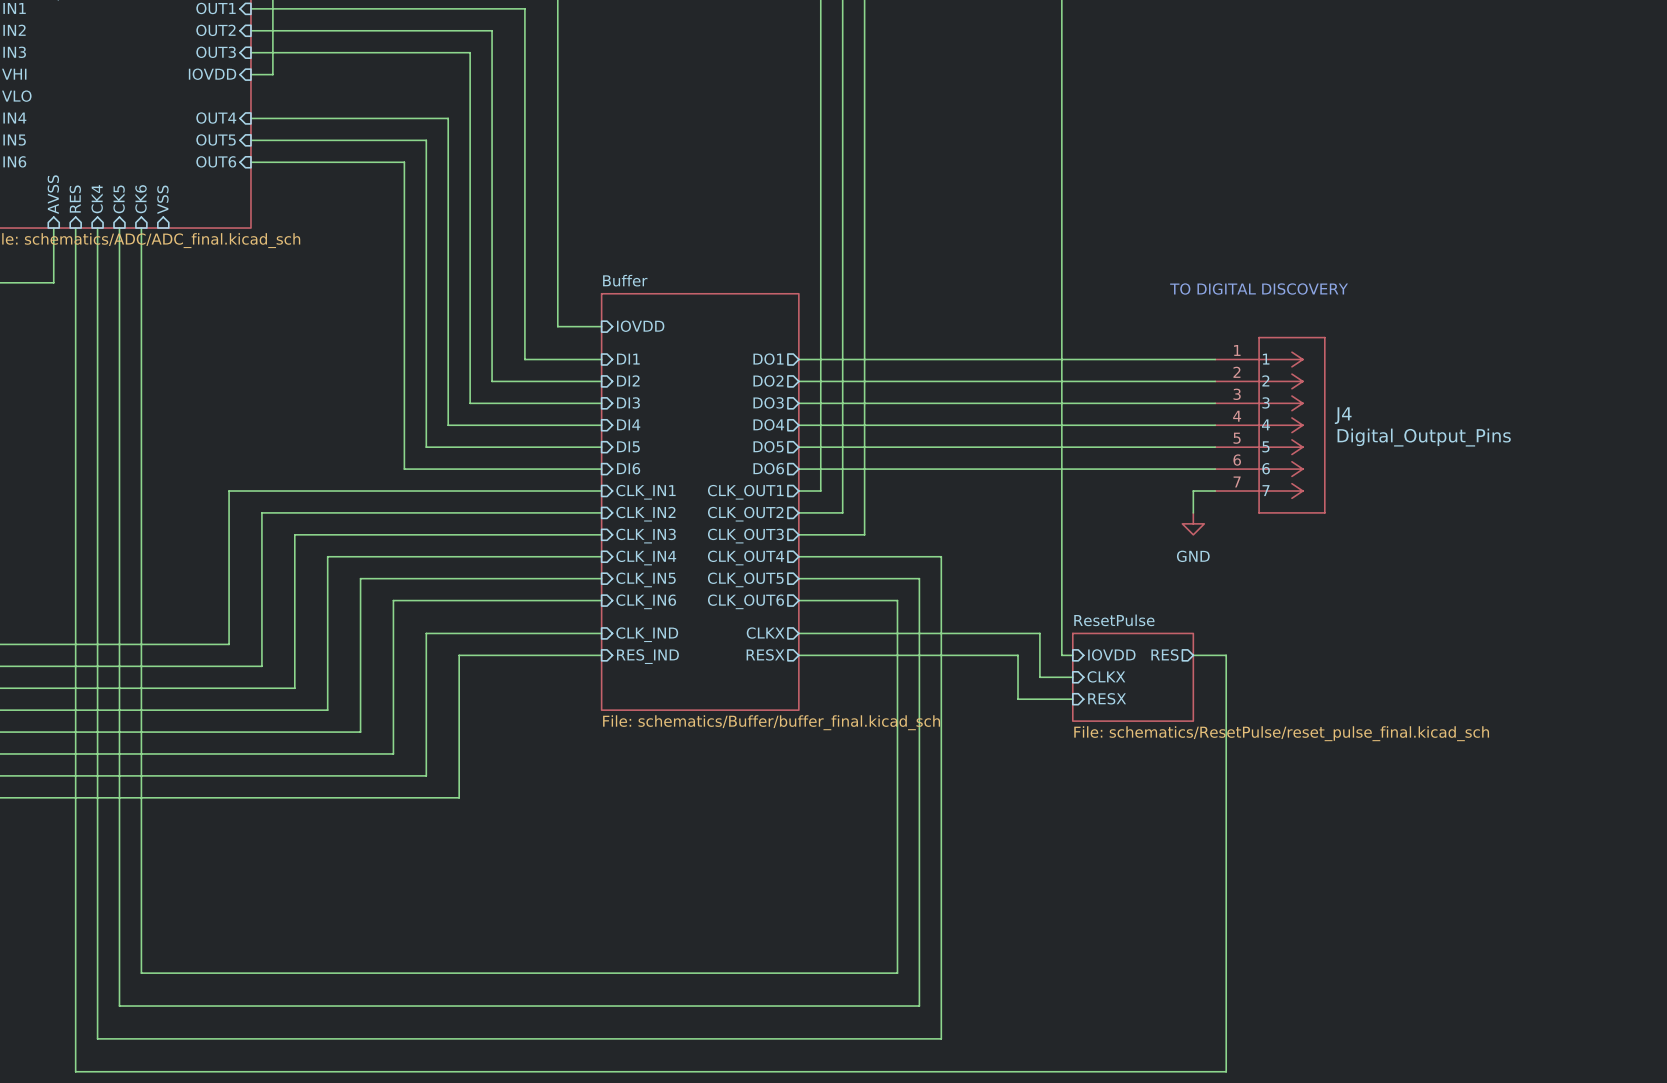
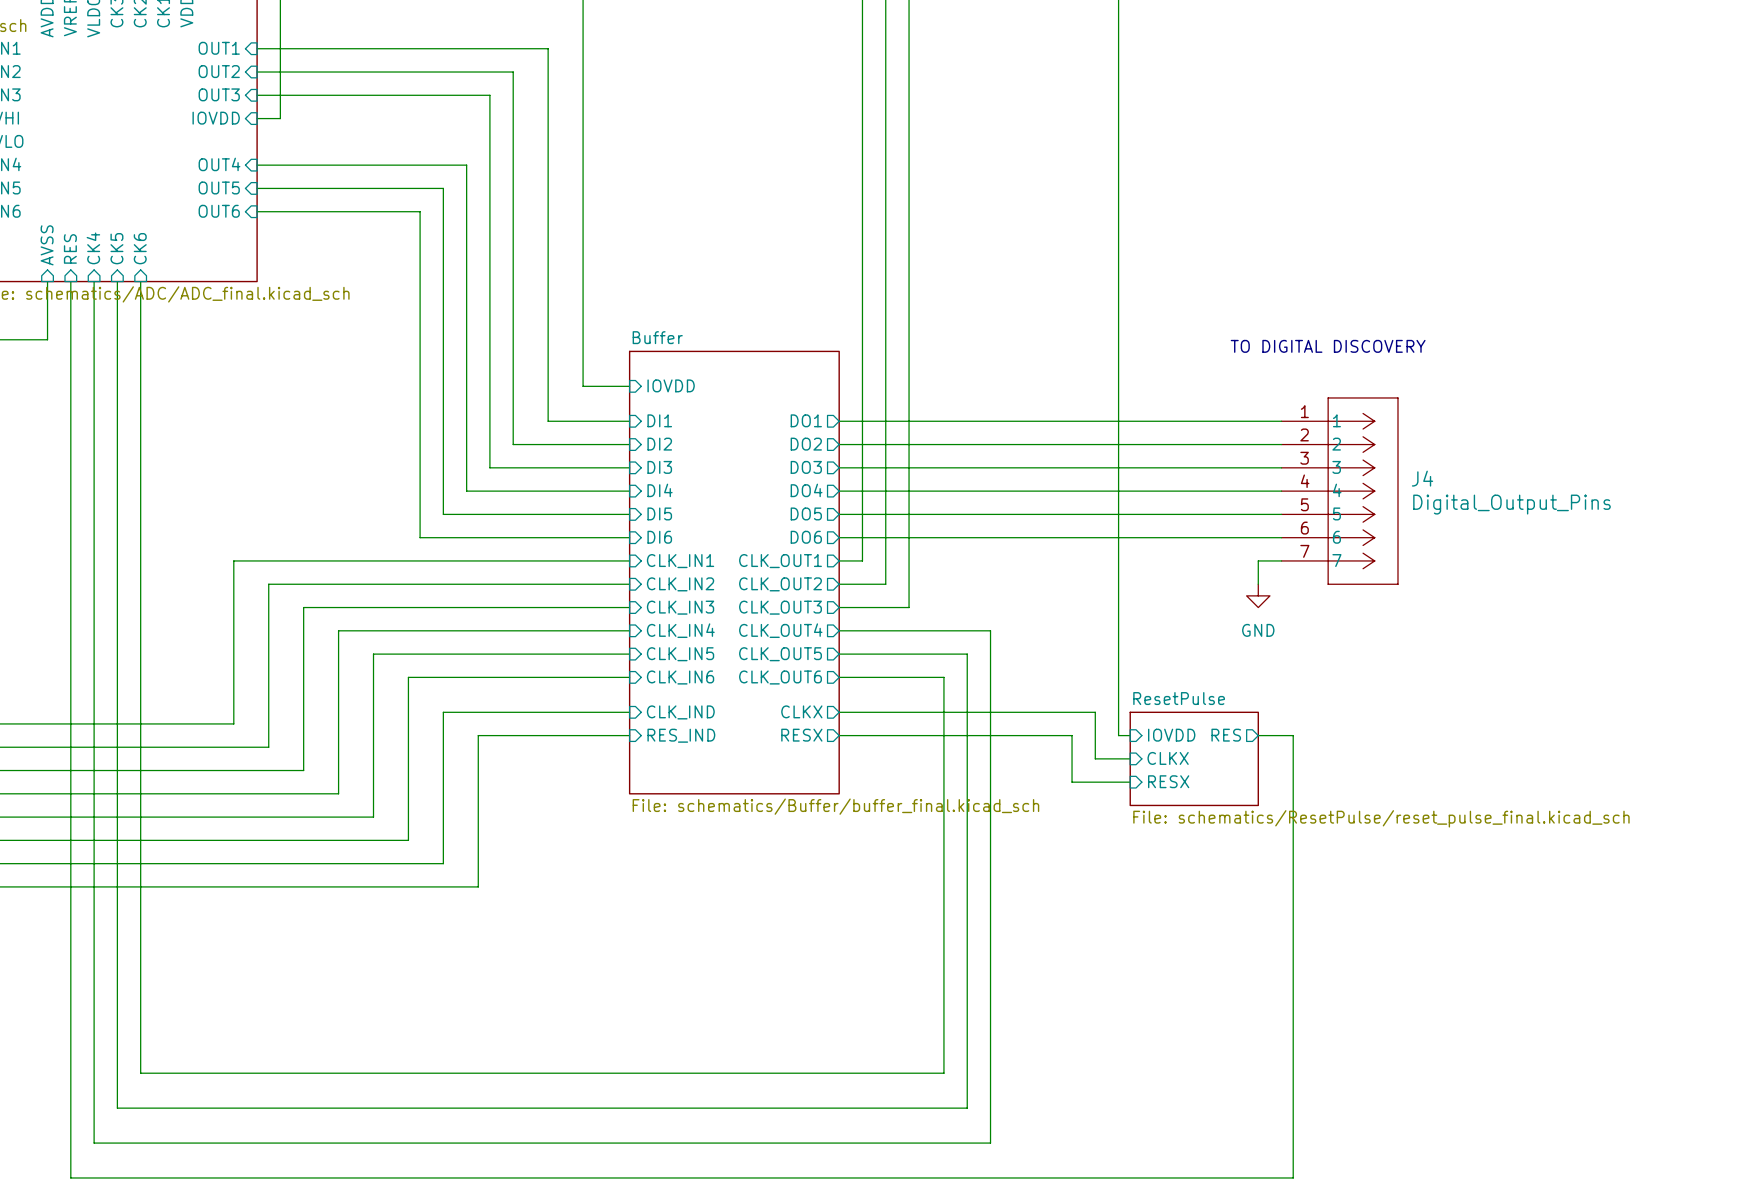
sheet pin: VSS (162, 199) -> none

